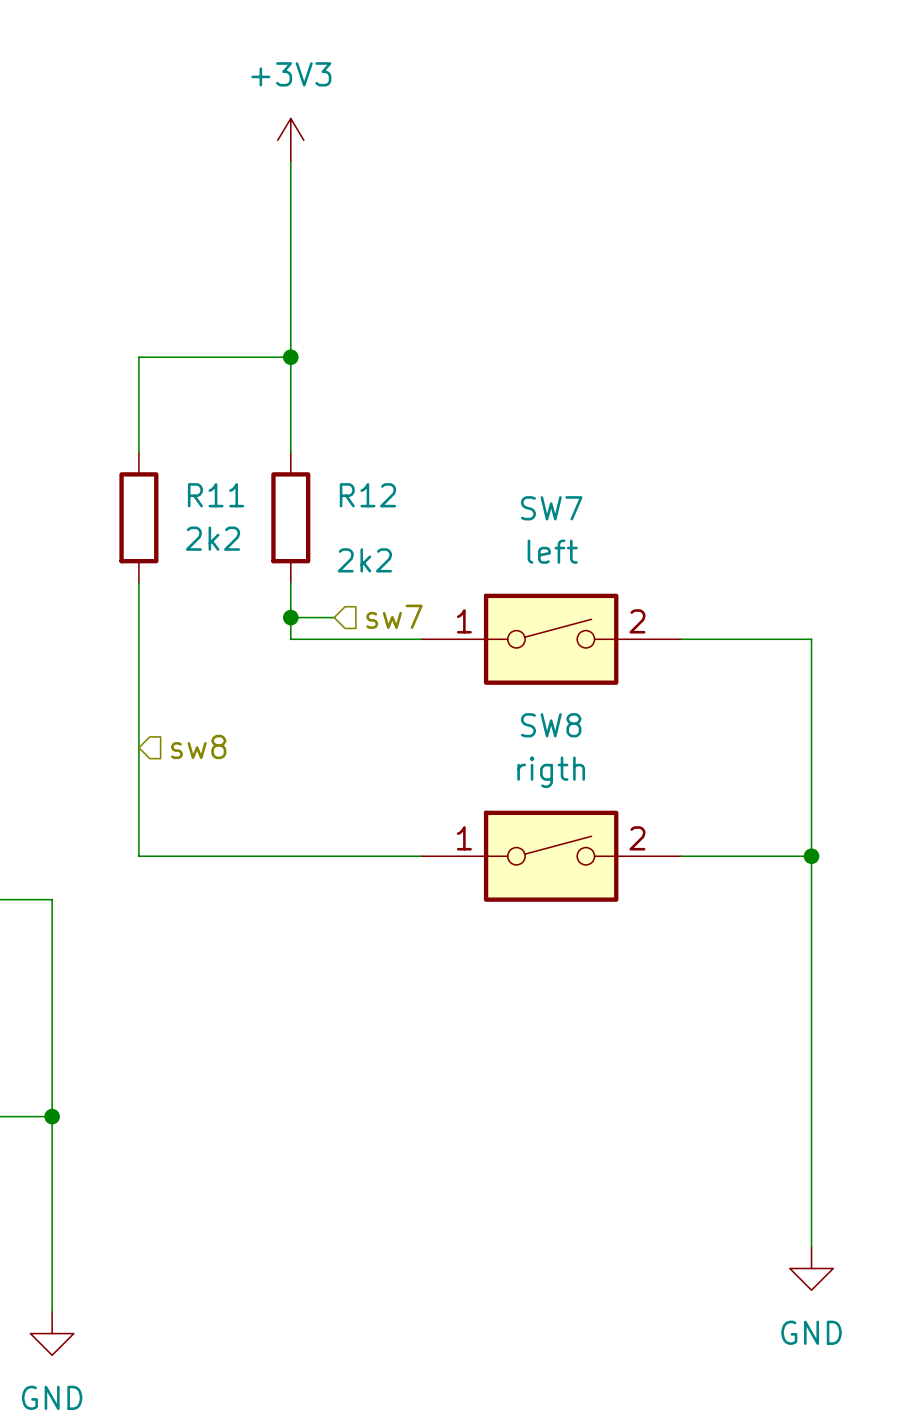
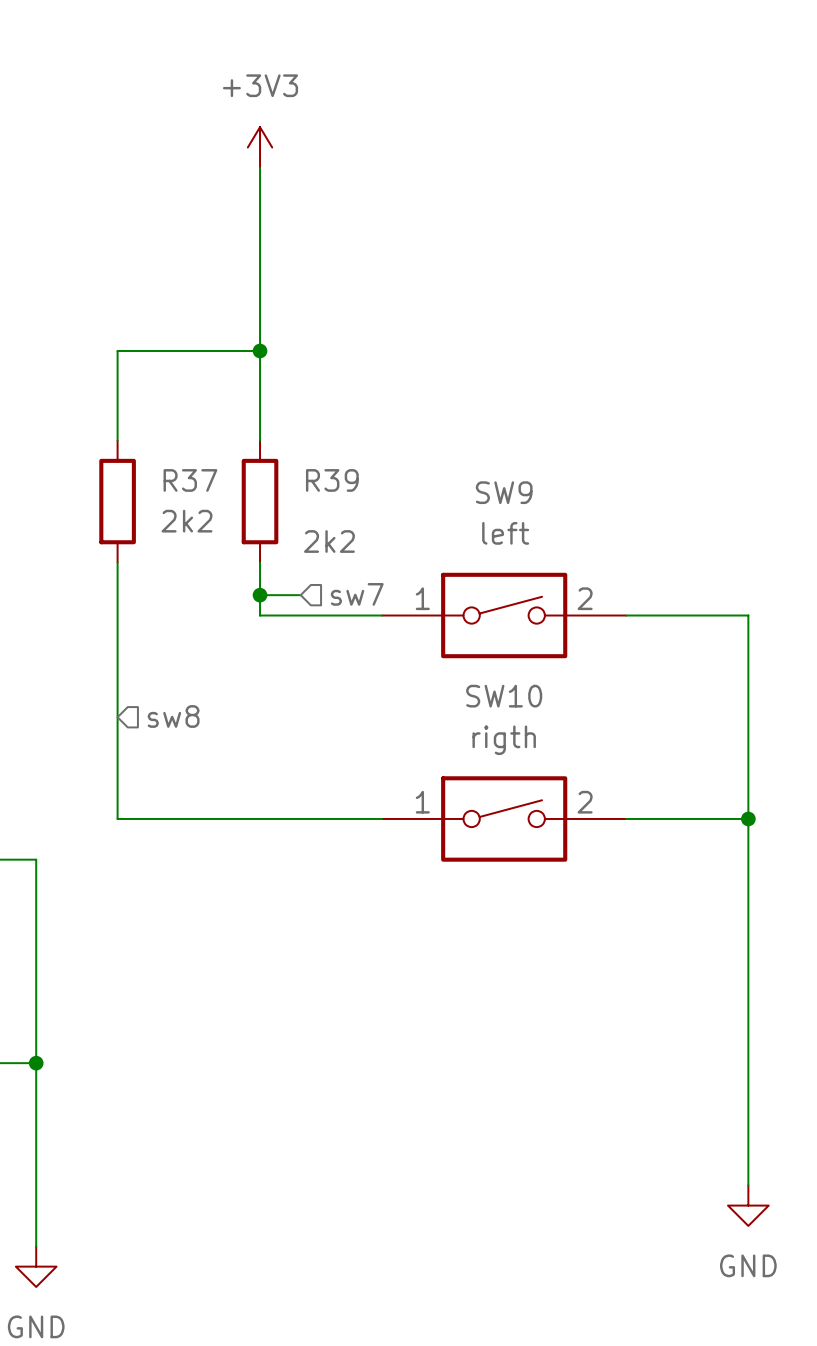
R11 name: R11 (216, 495) -> R37 (190, 480)
R12 name: R12 (367, 495) -> R39 (332, 480)
SW7 name: SW7 (551, 508) -> SW9 (504, 492)
SW8 name: SW8 (551, 725) -> SW10 (504, 696)

